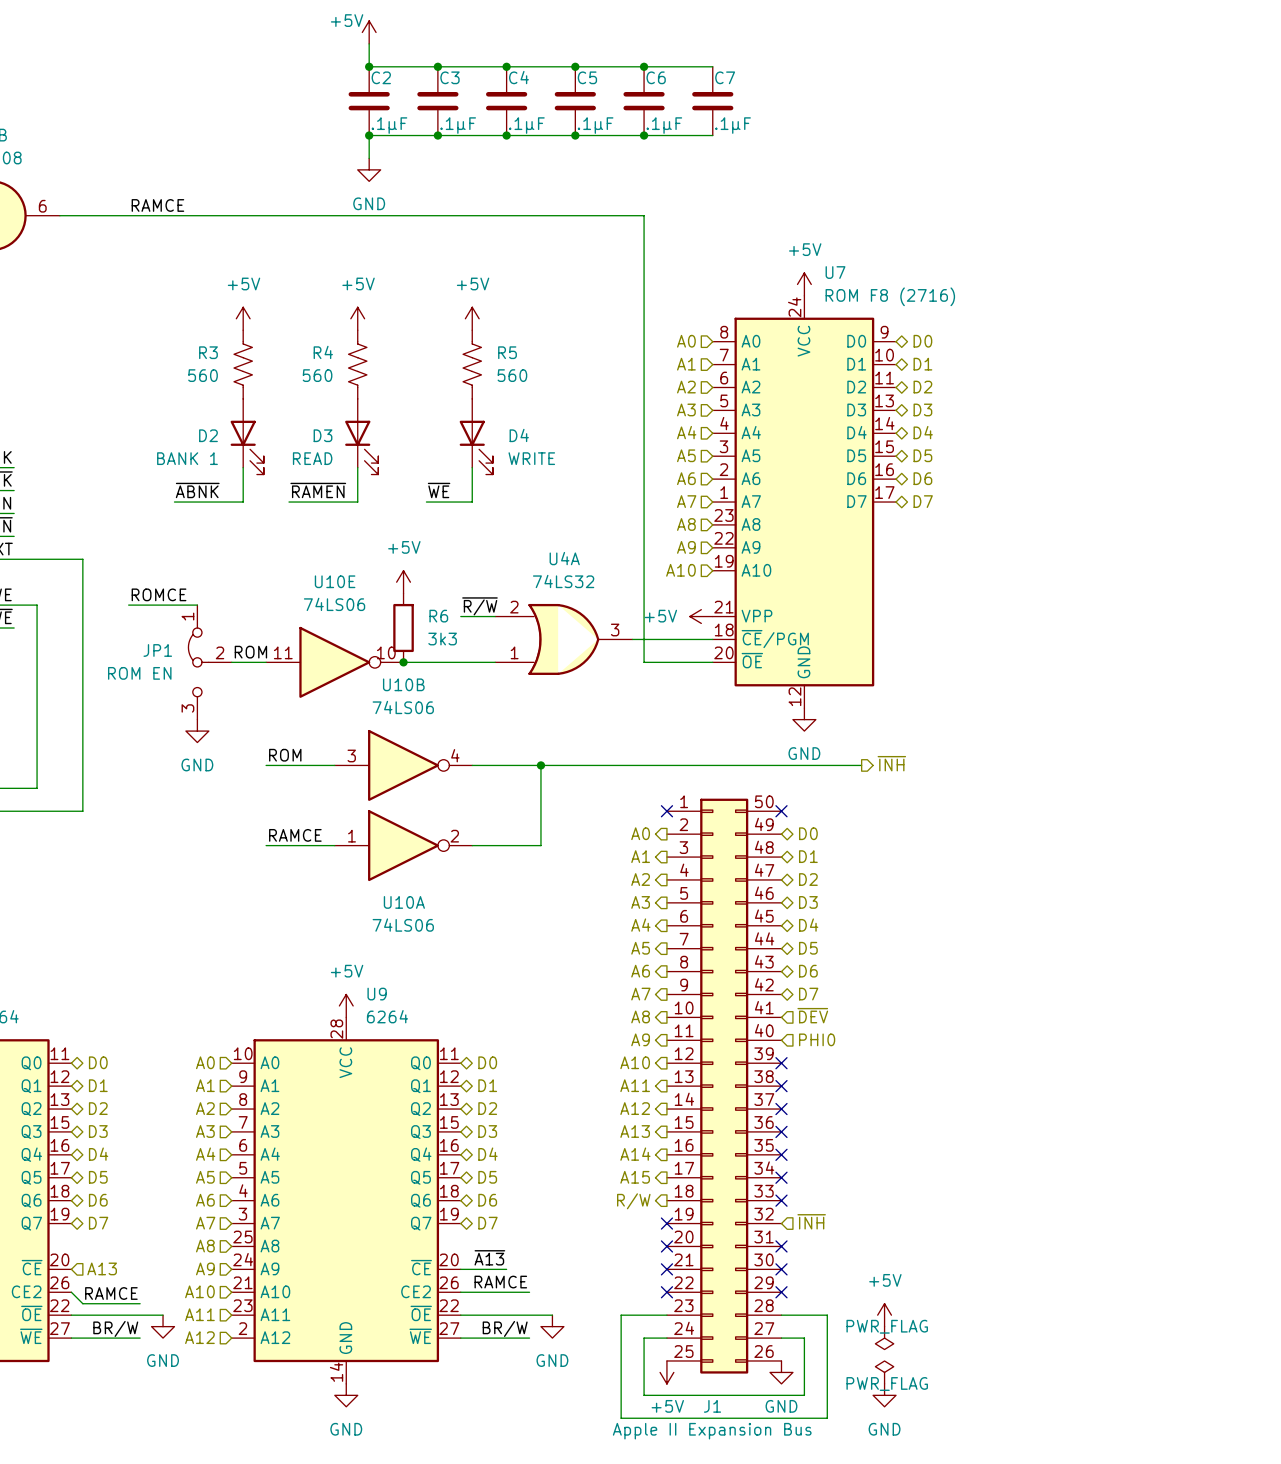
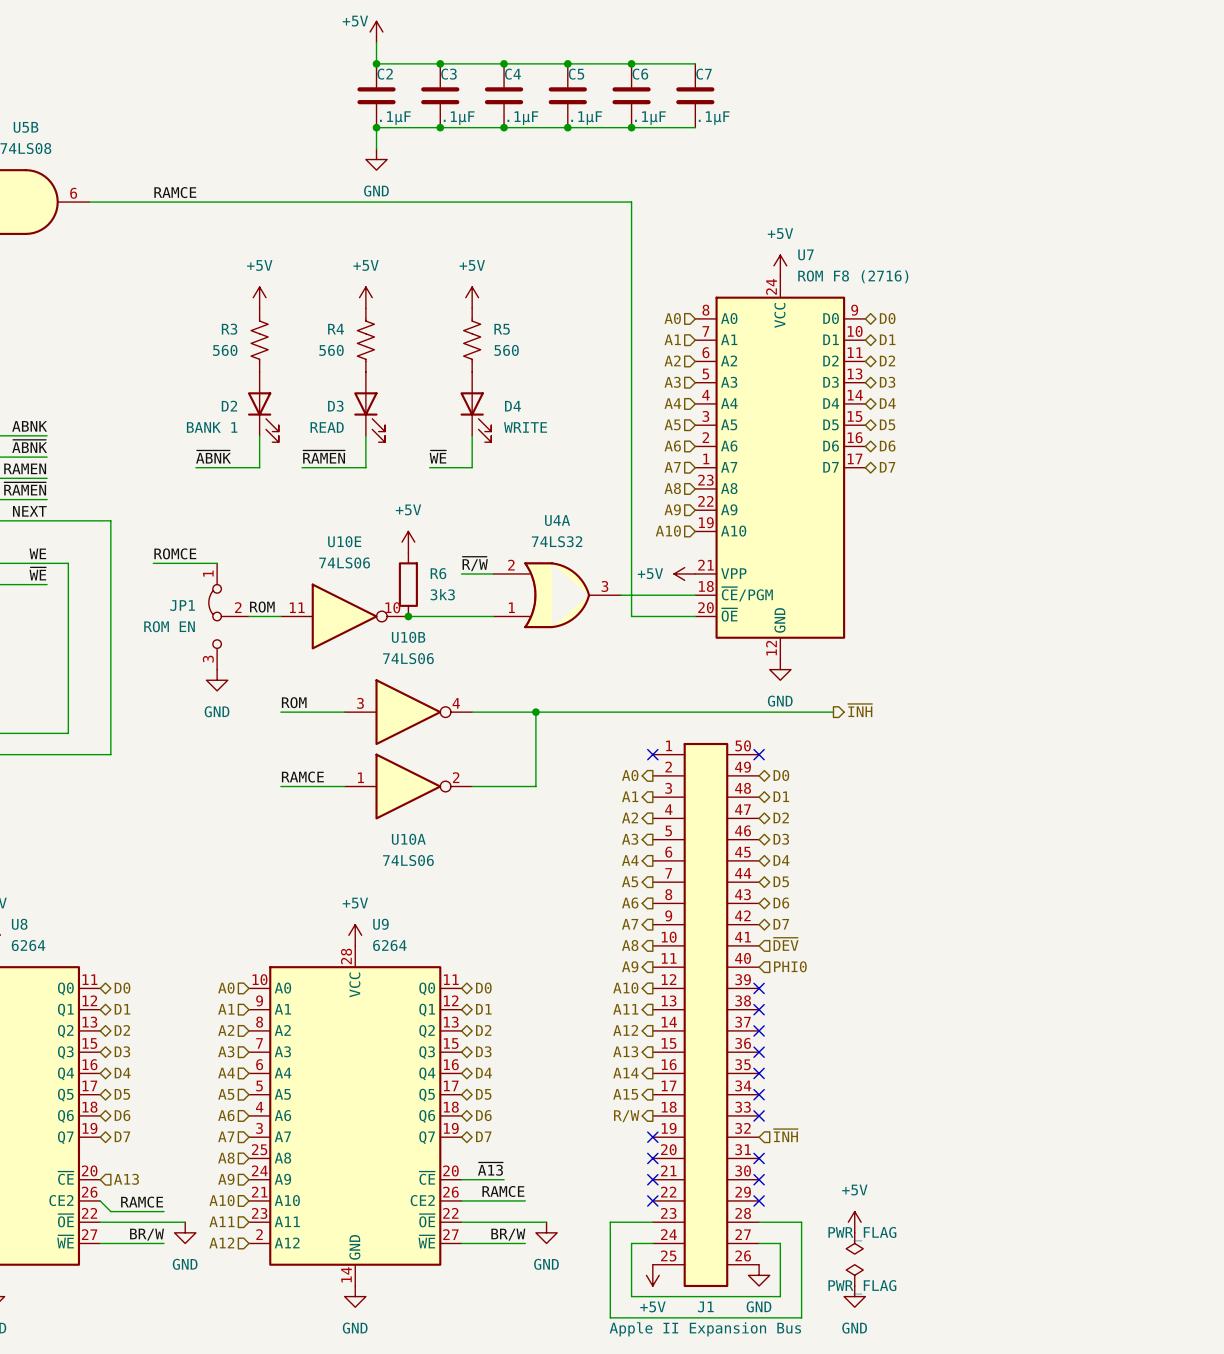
J1 symbol: [666, 798, 782, 1374] -> [652, 742, 760, 1288]

